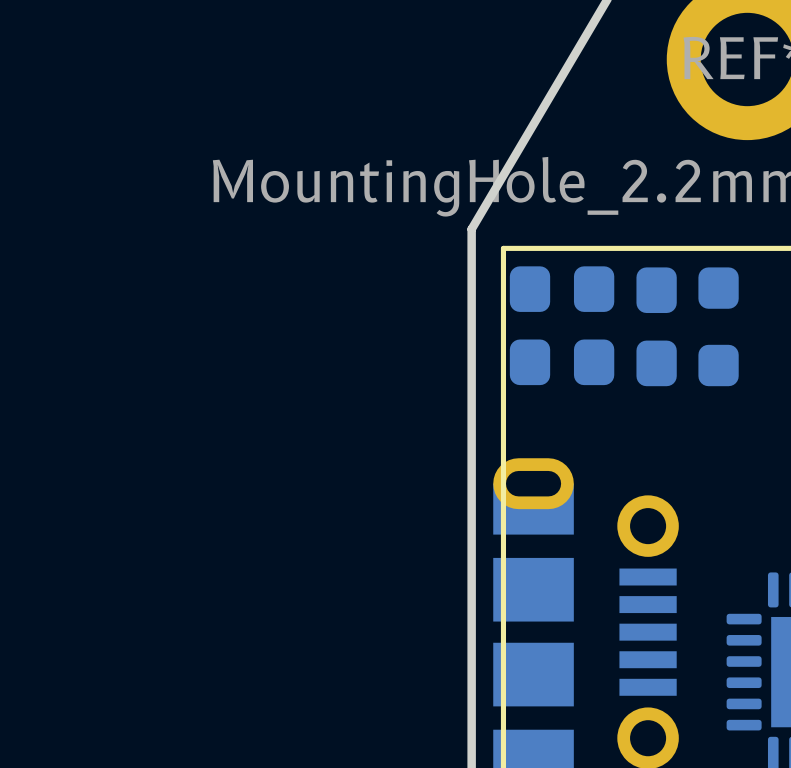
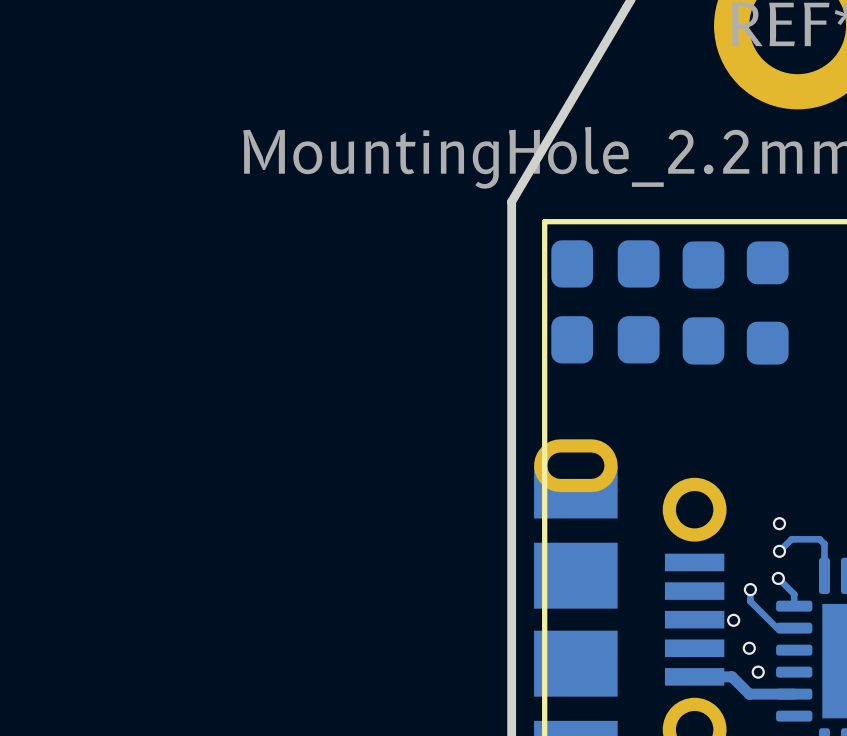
via: none -> (779, 523)
bottom track: none -> (779, 551) (791, 539) (819, 539) (824, 544) (824, 575)
via: none -> (779, 551)
bottom track: none -> (778, 578) (794, 594) (794, 606)
via: none -> (778, 578)
bottom track: none -> (750, 589) (750, 601) (777, 628) (794, 628)
via: none -> (750, 589)
via: none -> (733, 620)
via: none -> (749, 648)
via: none -> (758, 672)
bottom track: none -> (694, 676) (732, 676) (749, 694) (794, 694)

